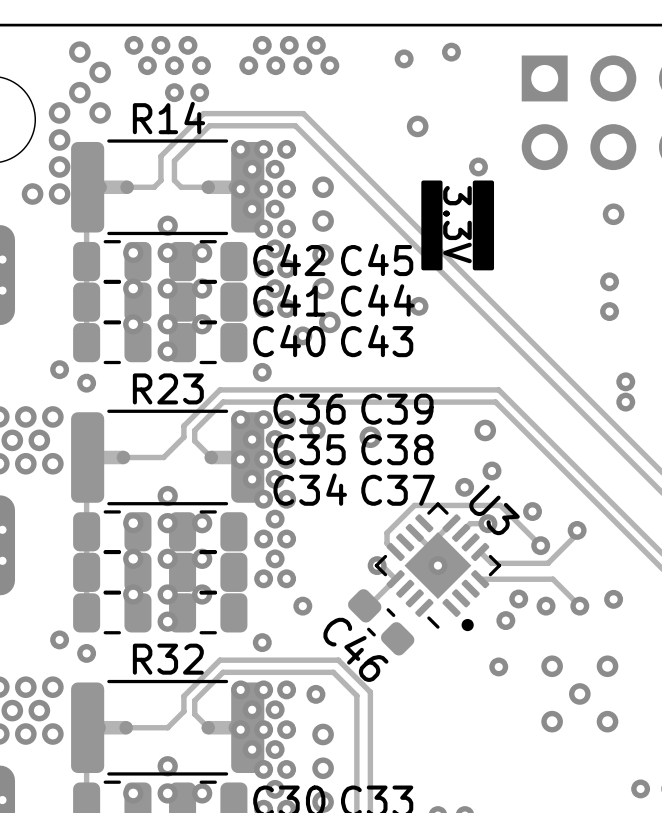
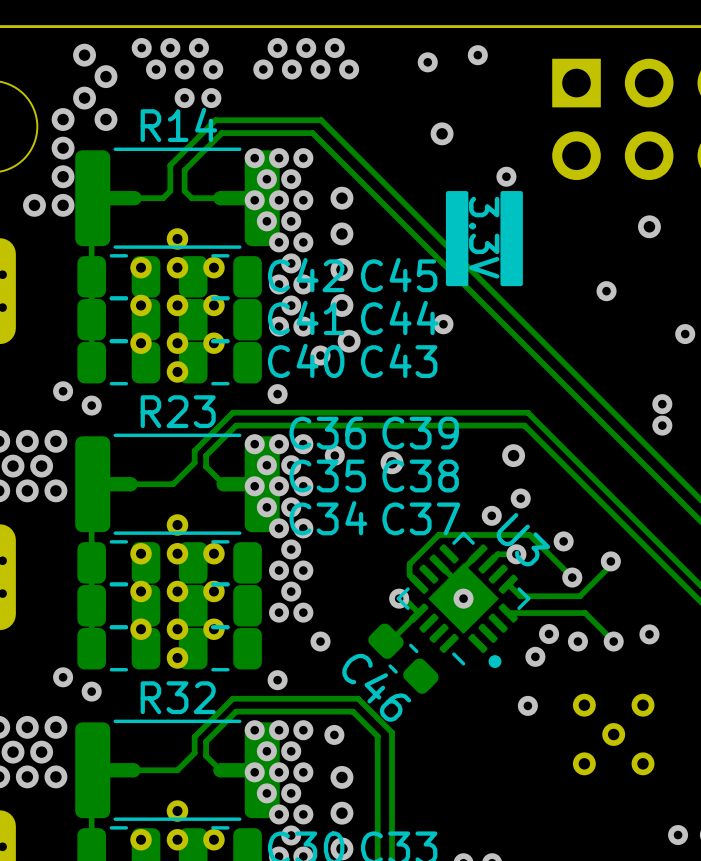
via: none -> (606, 291)
via: (609, 281) -> none
via: (609, 311) -> none
via: none -> (685, 334)

